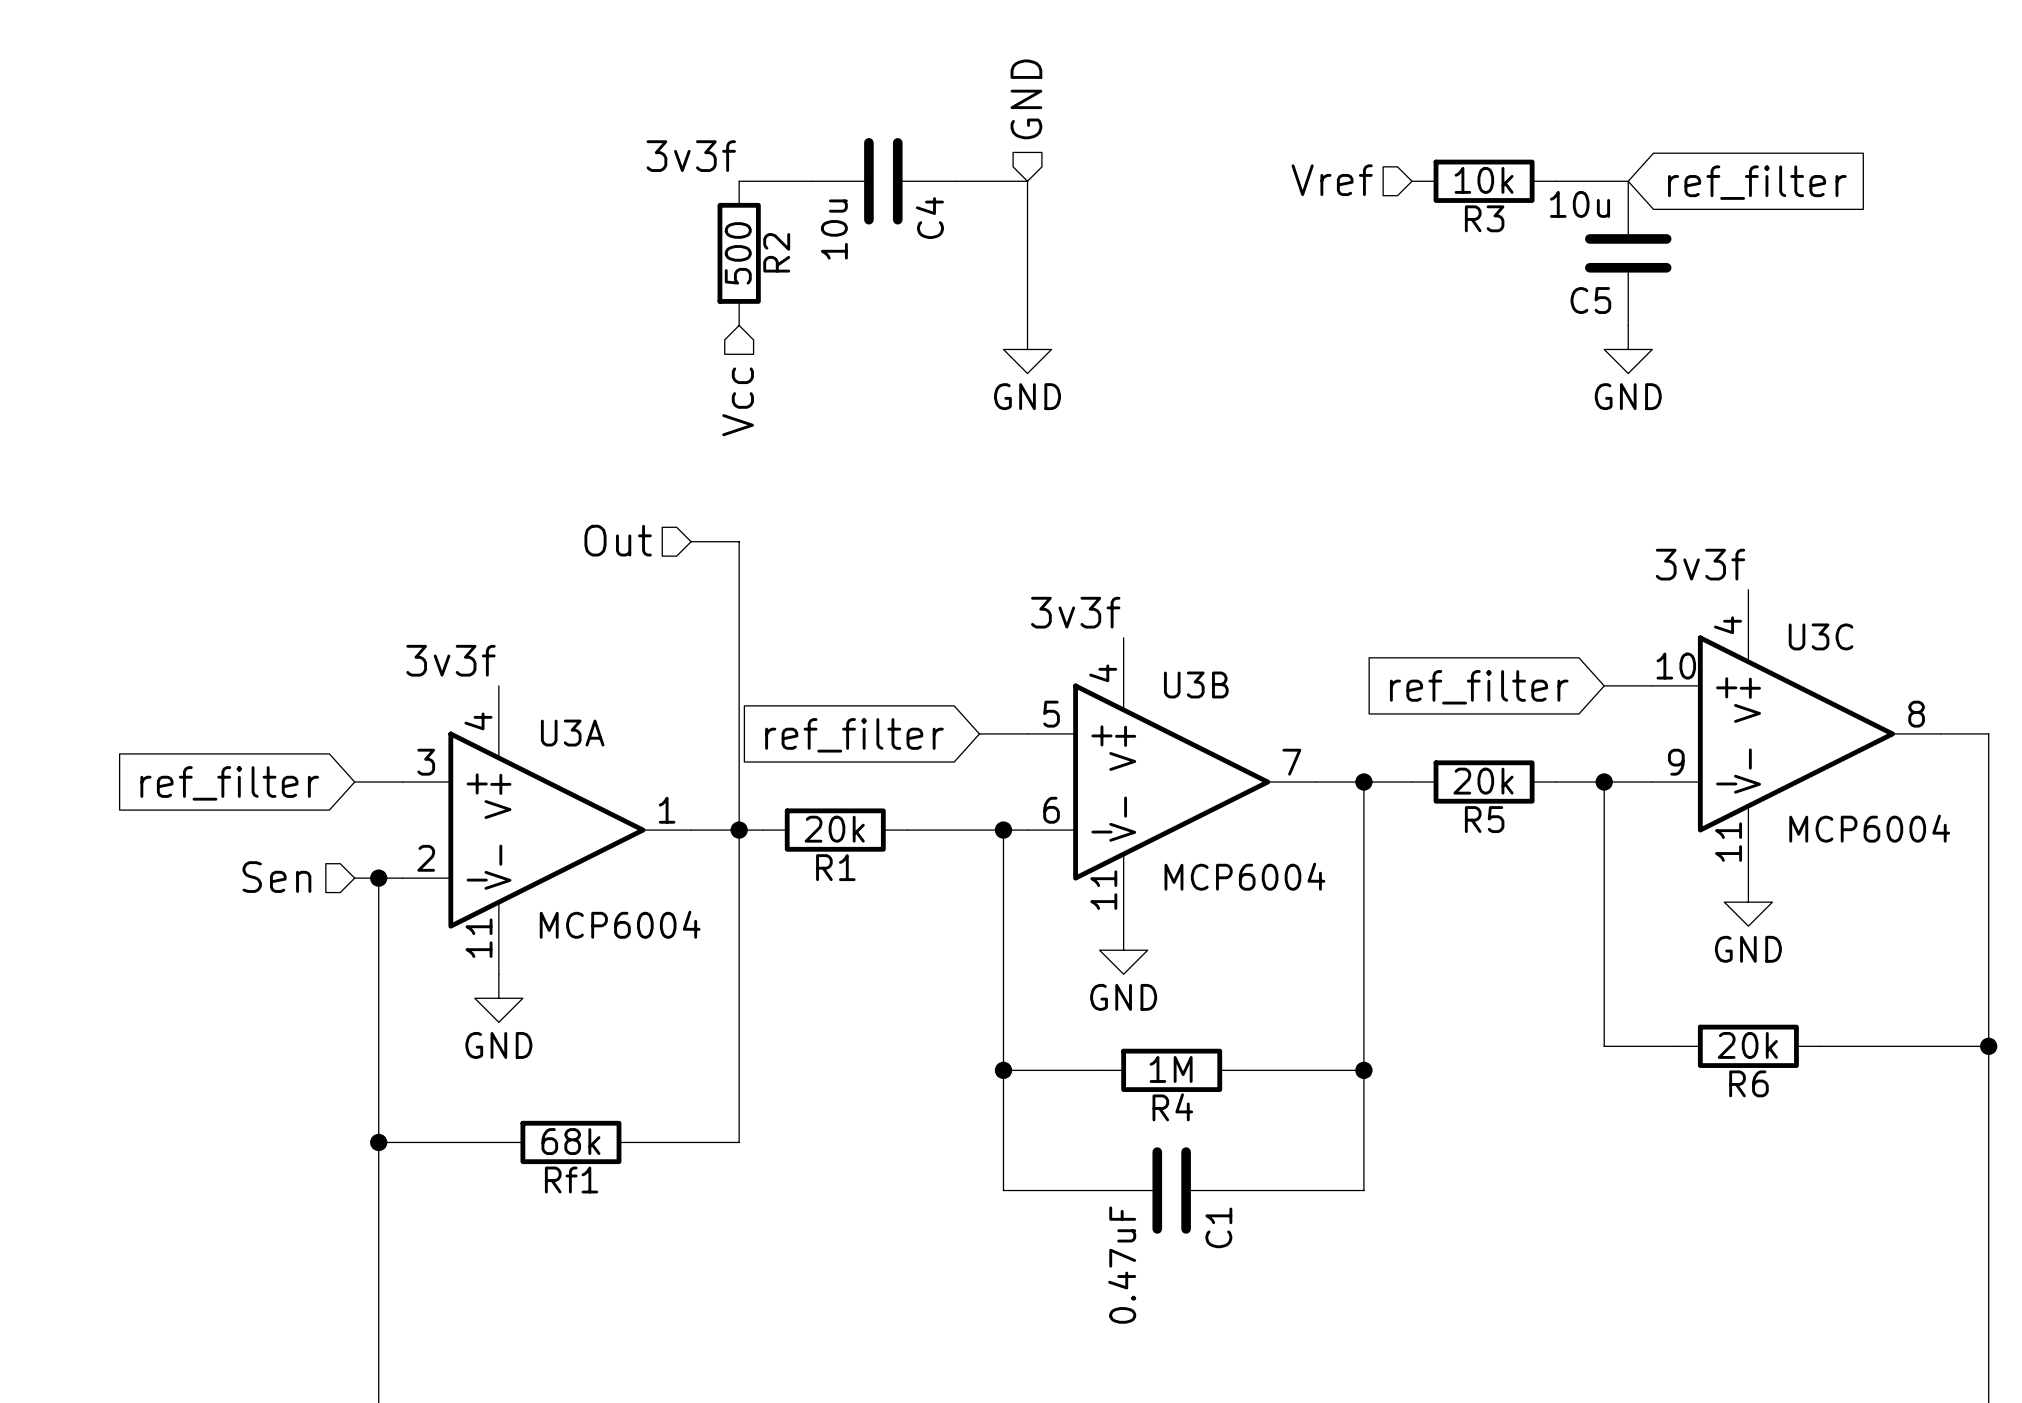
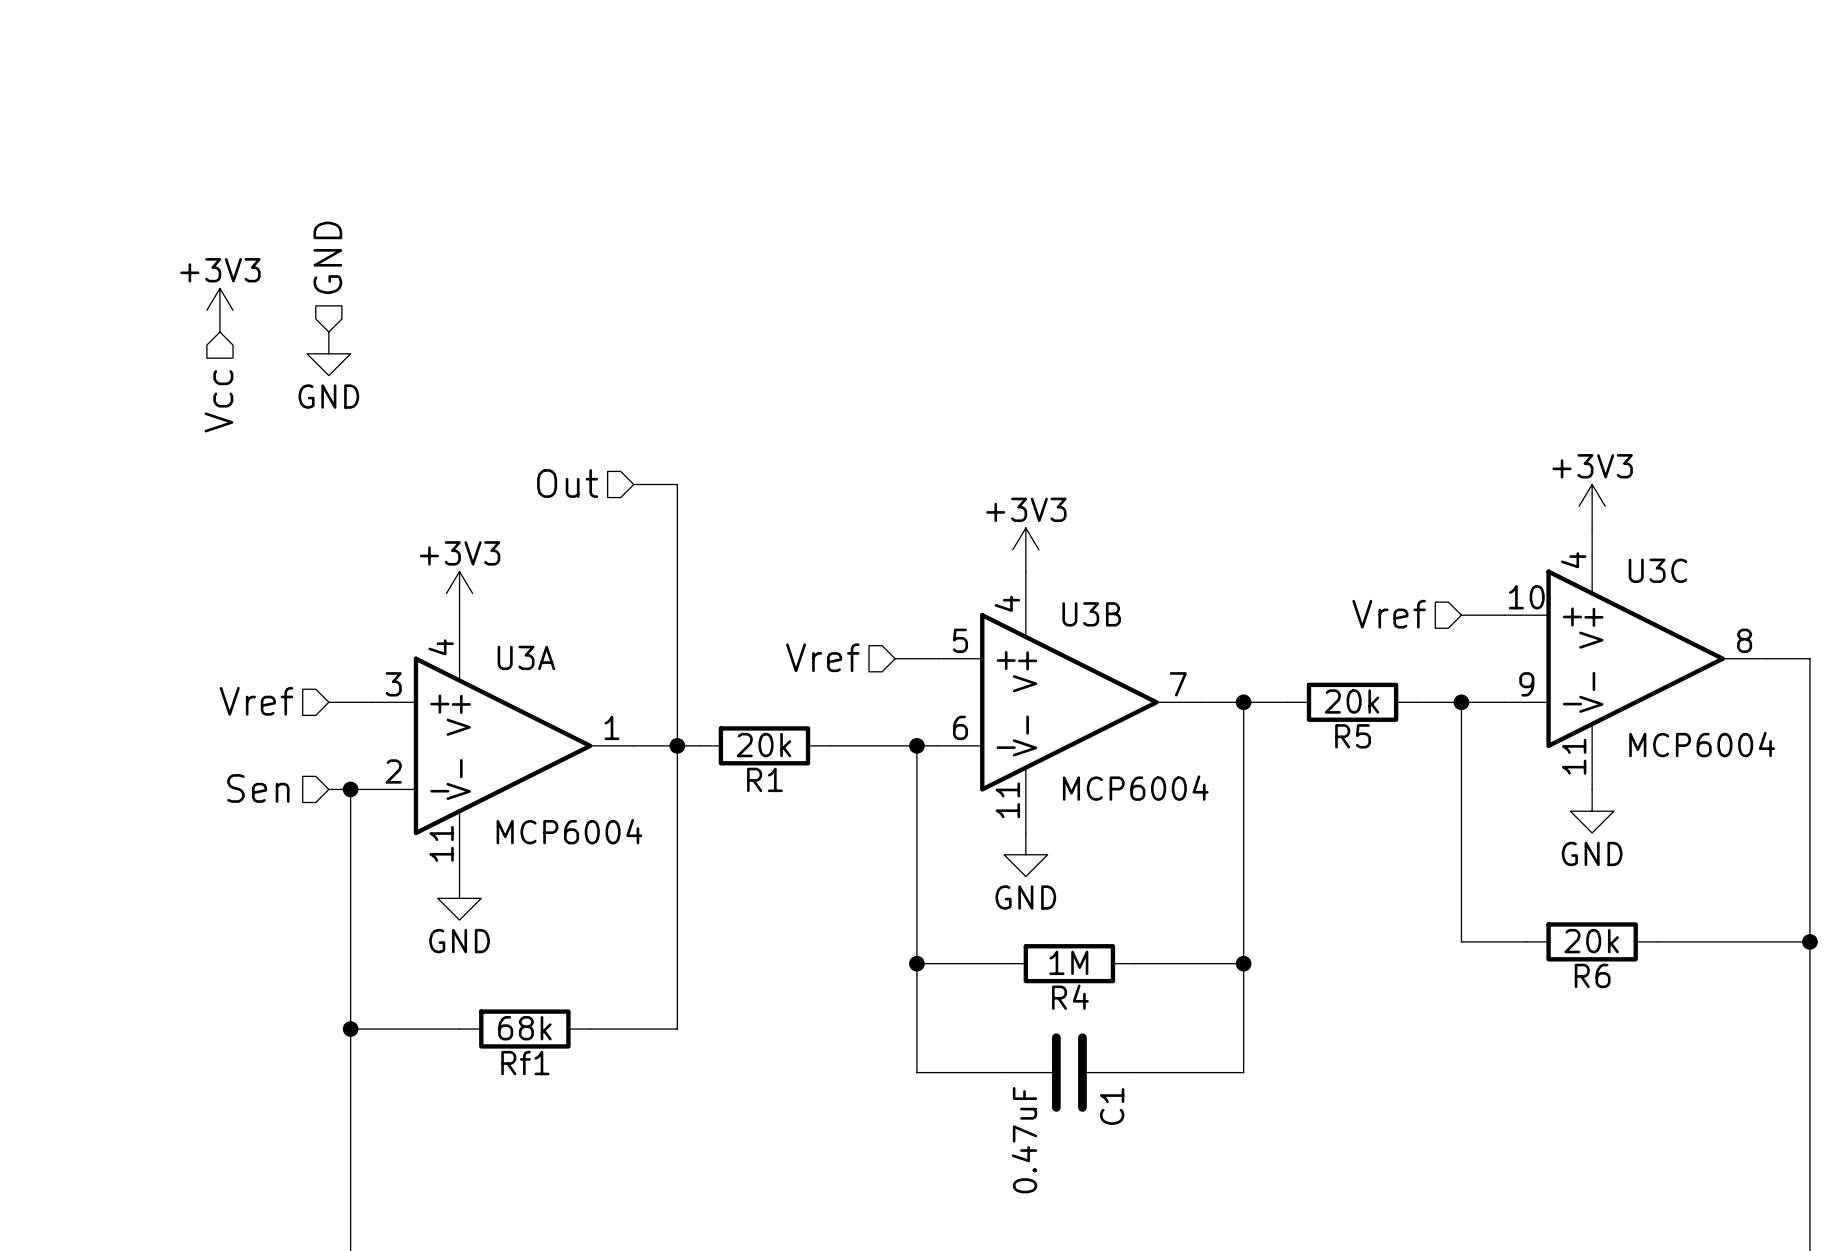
hierarchical label: GND (1026, 99) -> none
label: 3v3f (691, 156) -> none
hierarchical label: Vref (1332, 180) -> none
wire: (739, 181) (811, 181) -> none
C4: 10u (883, 181) -> none
wire: (955, 181) (1027, 181) (1027, 325) -> none
R3: 10k (1484, 181) -> none
wire: (1556, 181) (1628, 181) -> none
global label: ref_filter (1757, 182) -> none
R2: 500 (739, 253) -> none
C5: 10u (1628, 253) -> none
hierarchical label: none -> GND (327, 257)
power symbol: none -> +3V3 (219, 310)
power symbol: GND (1027, 349) -> none
power symbol: GND (1628, 349) -> none
power symbol: none -> GND (328, 353)
hierarchical label: Vcc (738, 401) -> none
hierarchical label: none -> Vcc (218, 401)
label: 3v3f (1700, 564) -> none
power symbol: none -> +3V3 (1592, 506)
label: 3v3f (1075, 612) -> none
power symbol: none -> +3V3 (1025, 549)
label: 3v3f (450, 660) -> none
power symbol: none -> +3V3 (459, 593)
hierarchical label: none -> Vref (1389, 614)
global label: ref_filter (1479, 687) -> none
hierarchical label: none -> Vref (822, 657)
global label: ref_filter (854, 735) -> none
hierarchical label: none -> Vref (256, 701)
global label: ref_filter (229, 783) -> none

